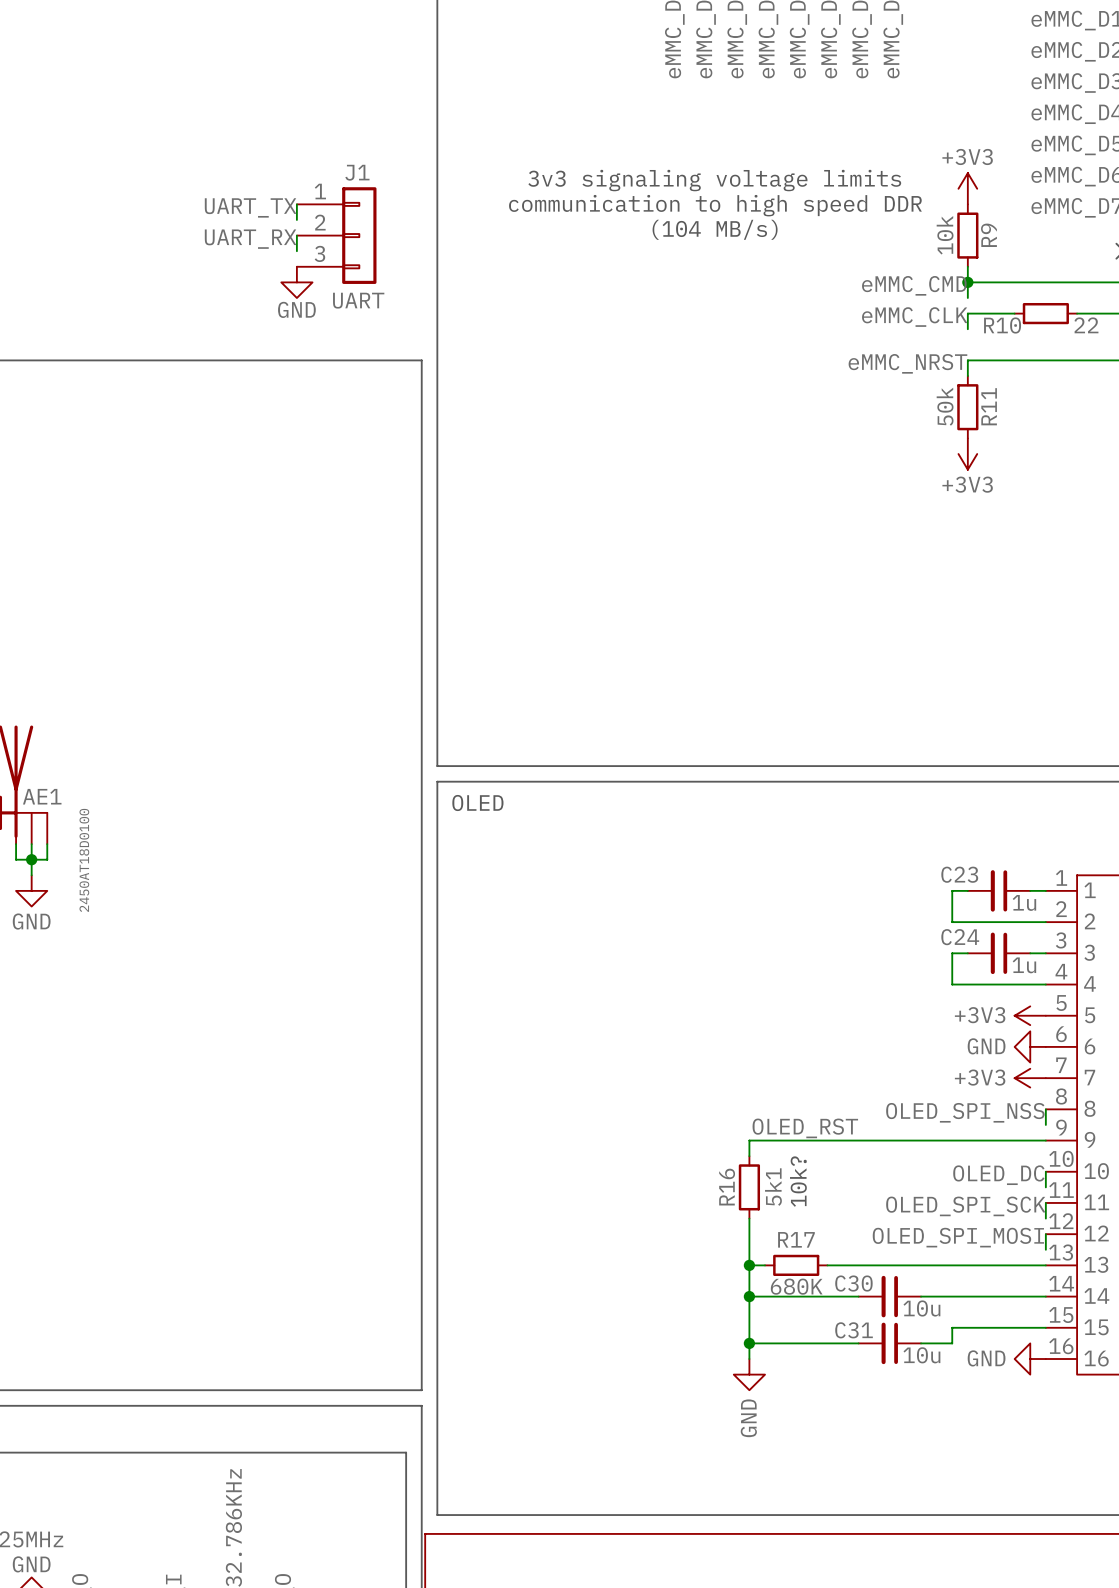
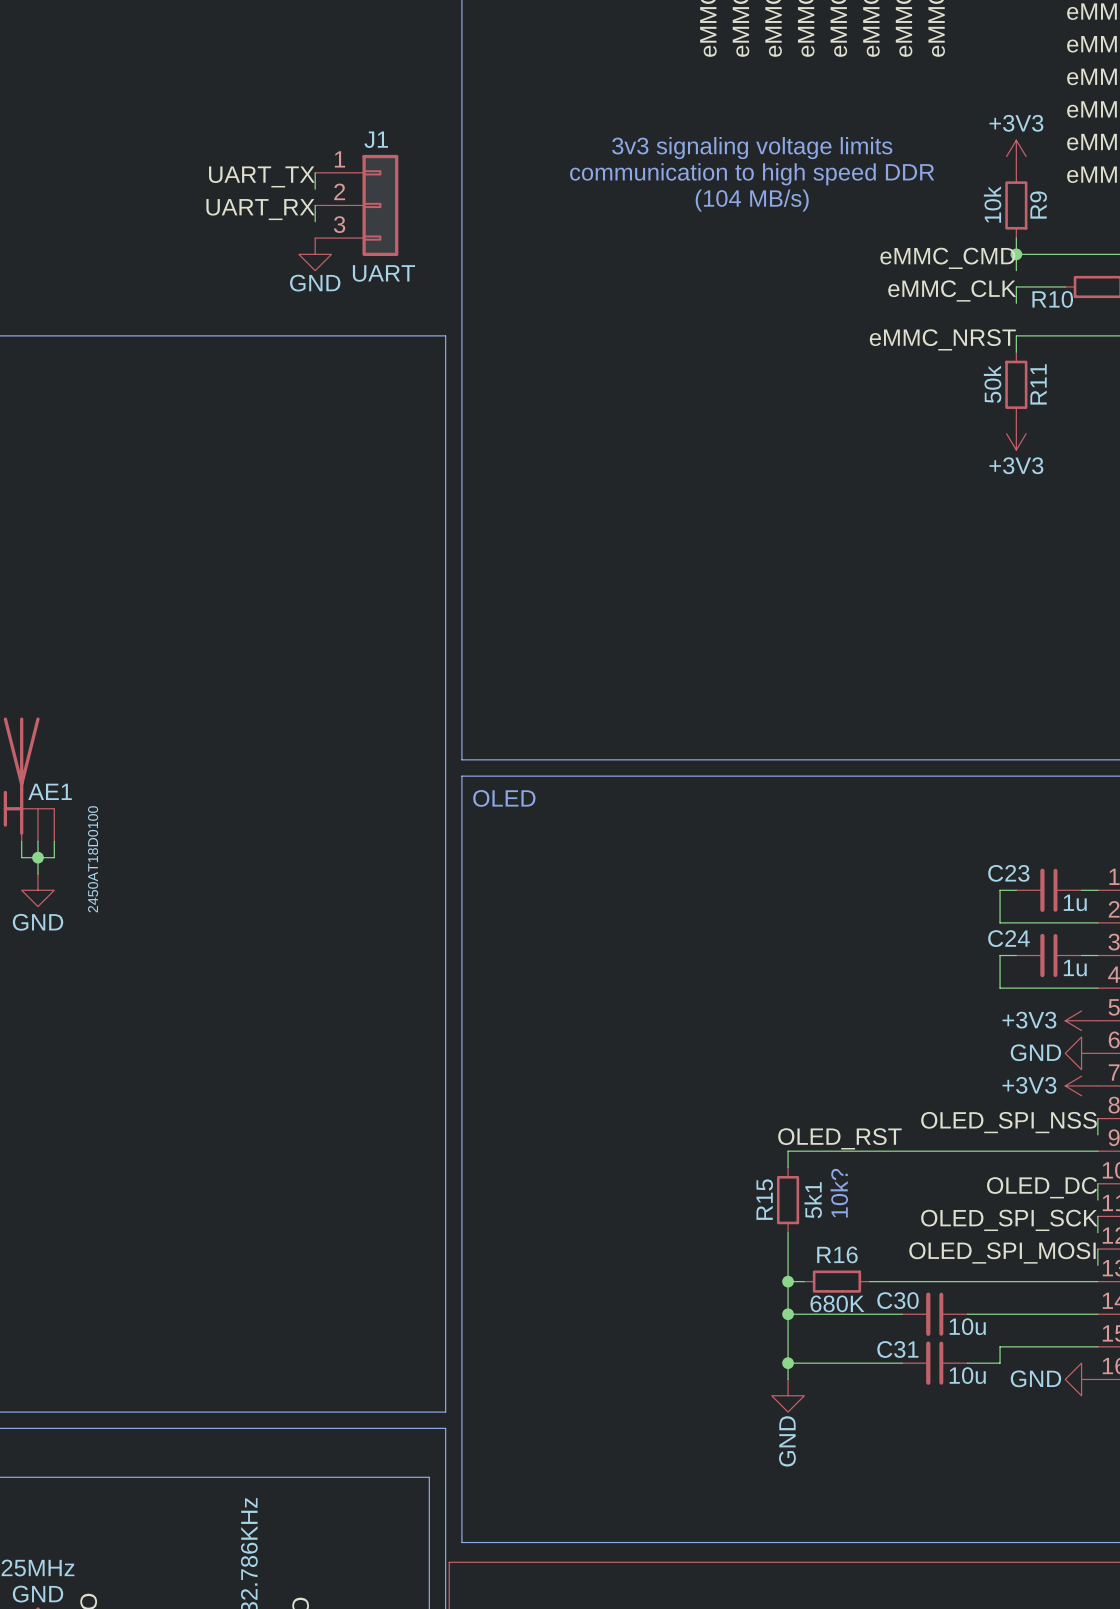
R16 name: R16 (727, 1187) -> R15 (764, 1199)
R17 name: R17 (796, 1239) -> R16 (837, 1254)

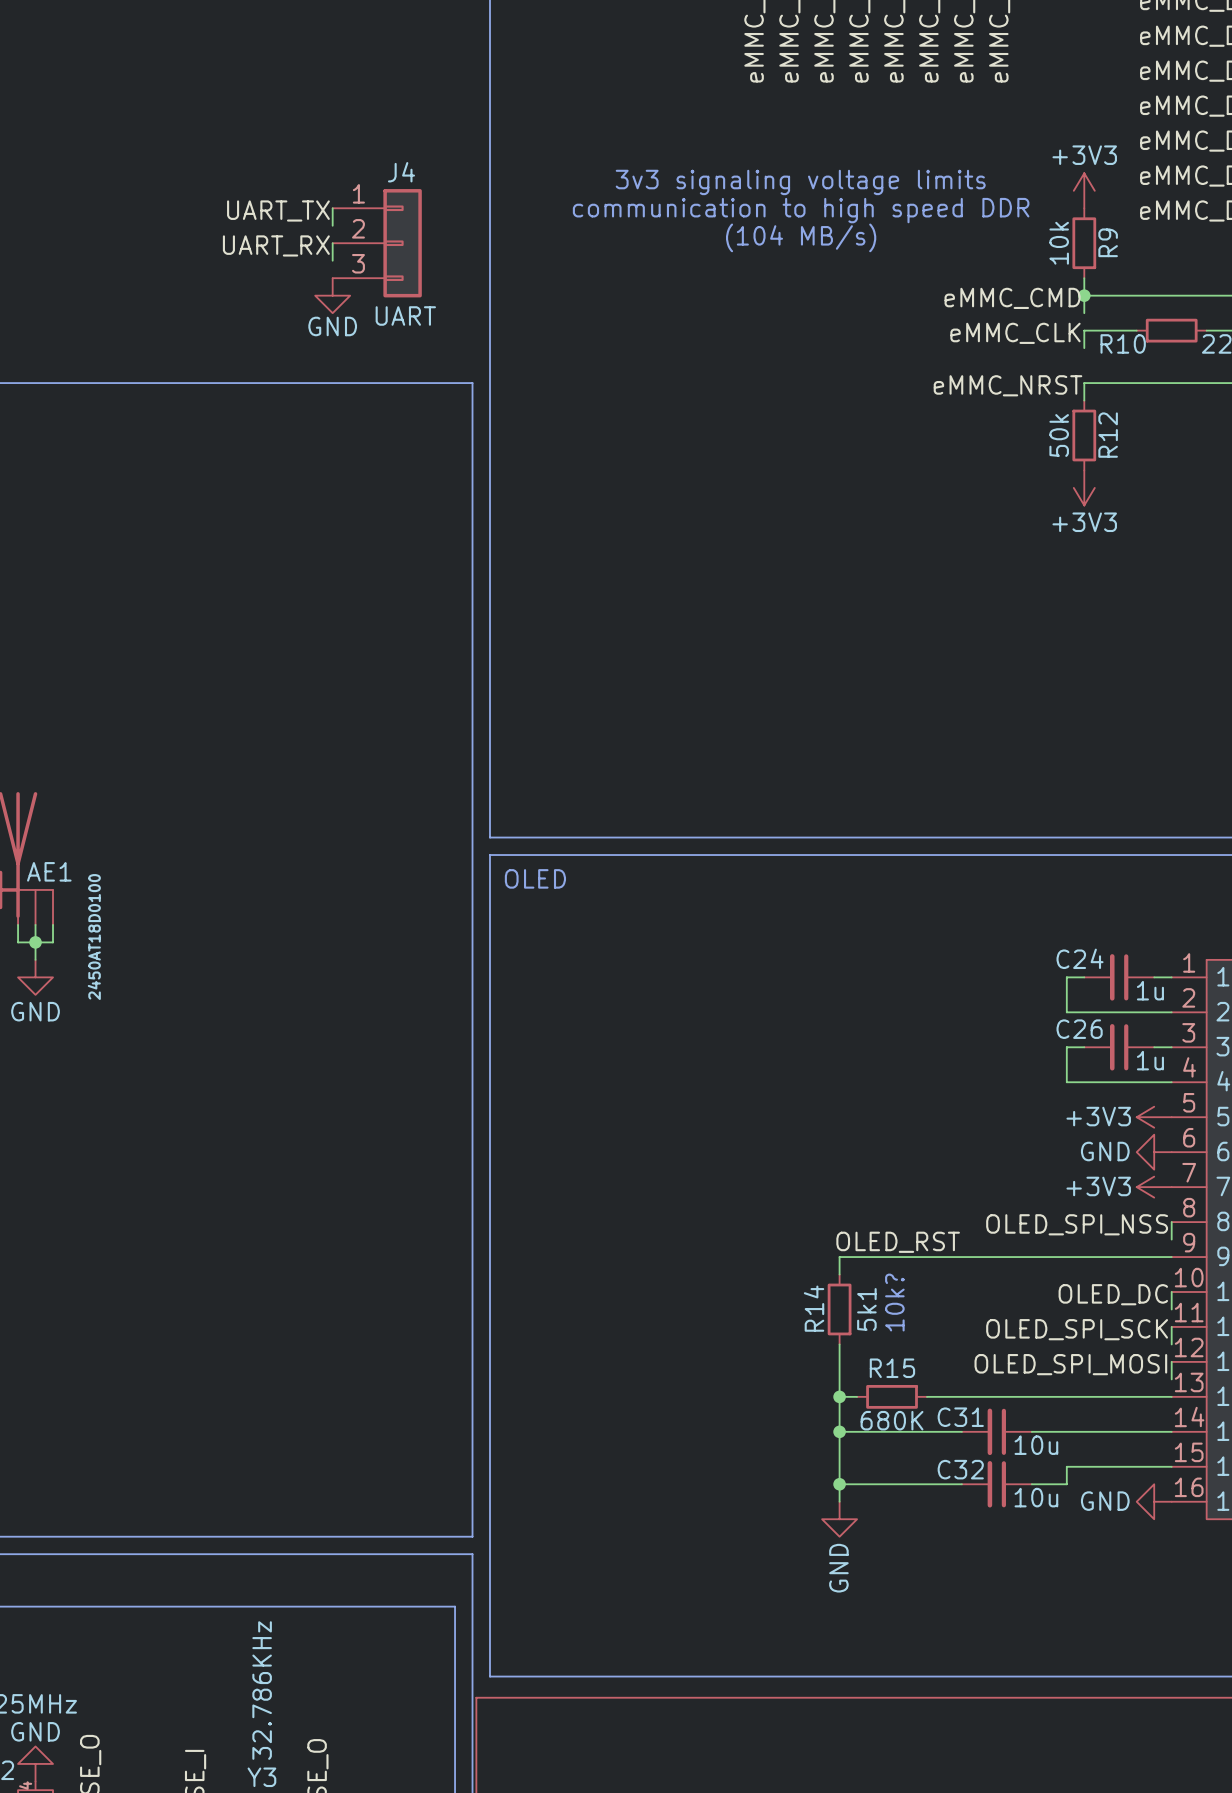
J1 name: J1 (376, 139) -> J4 (401, 172)
R11 name: R11 (1038, 384) -> R12 (1108, 435)
C23 name: C23 (1008, 873) -> C24 (1080, 958)
C24 name: C24 (1008, 938) -> C26 (1079, 1029)
R15 name: R15 (764, 1199) -> R14 (814, 1308)
R16 name: R16 (837, 1254) -> R15 (892, 1368)
C30 name: C30 (897, 1300) -> C31 (960, 1417)
C31 name: C31 (897, 1349) -> C32 (960, 1469)

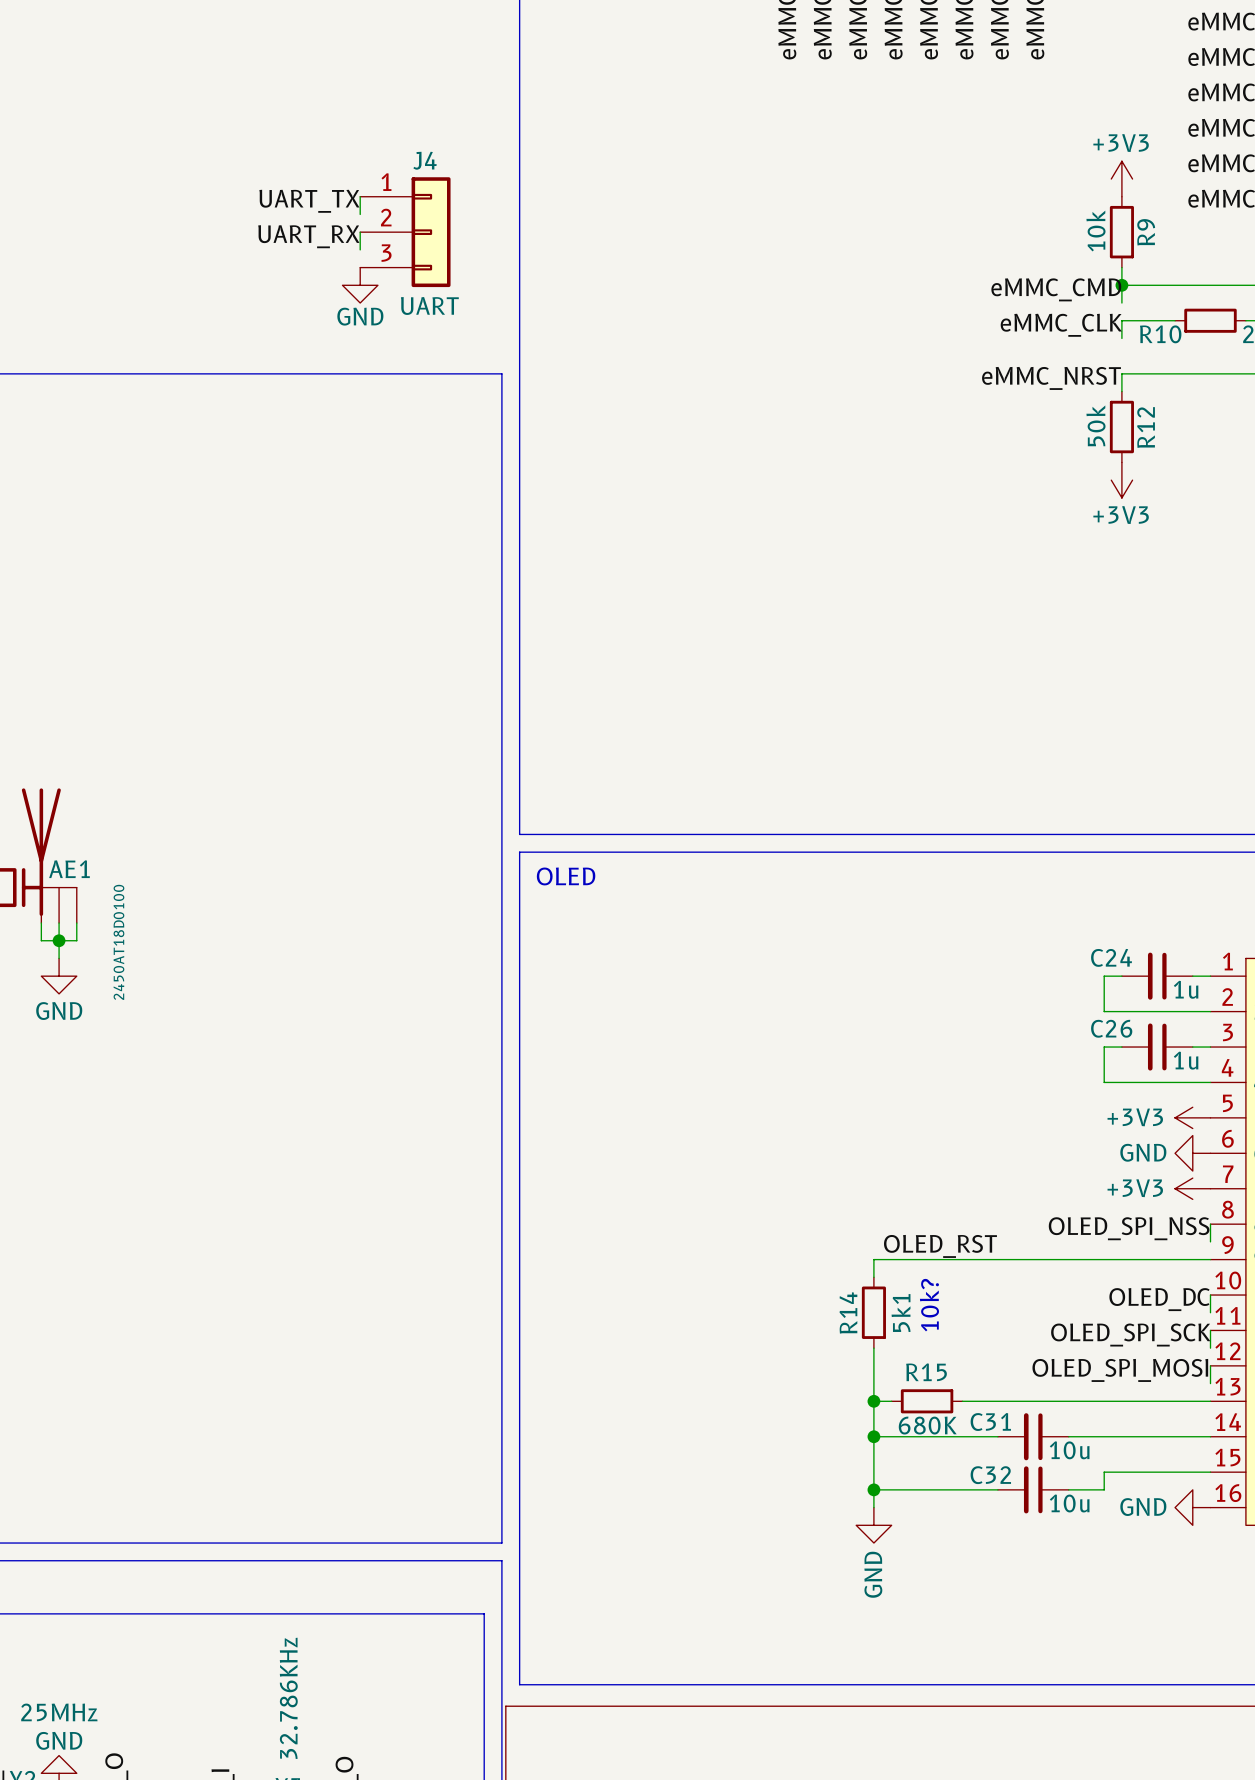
text: 3v3 signaling voltage limits (800, 182) -> none
text: communication to high speed DDR (801, 210) -> none
text: (104 MB/s) (801, 237) -> none

